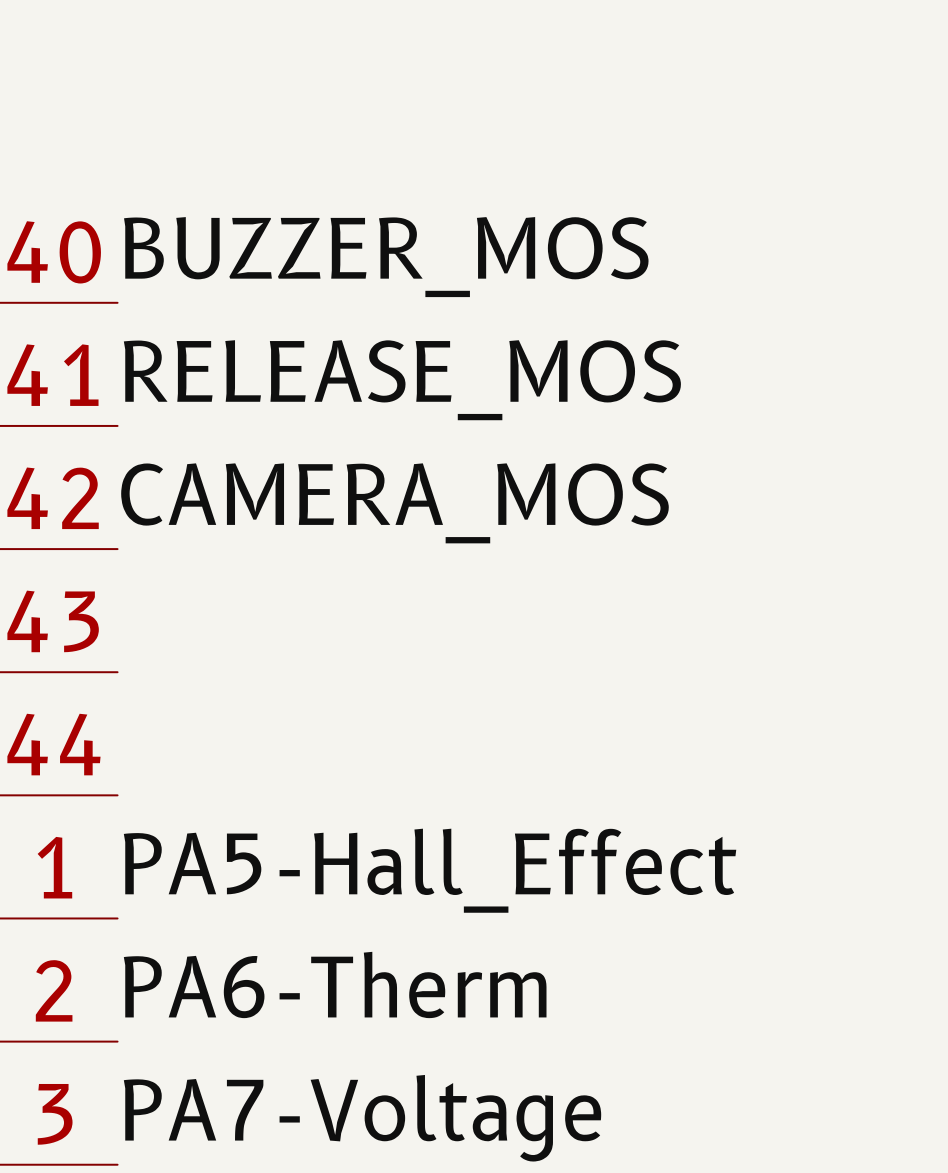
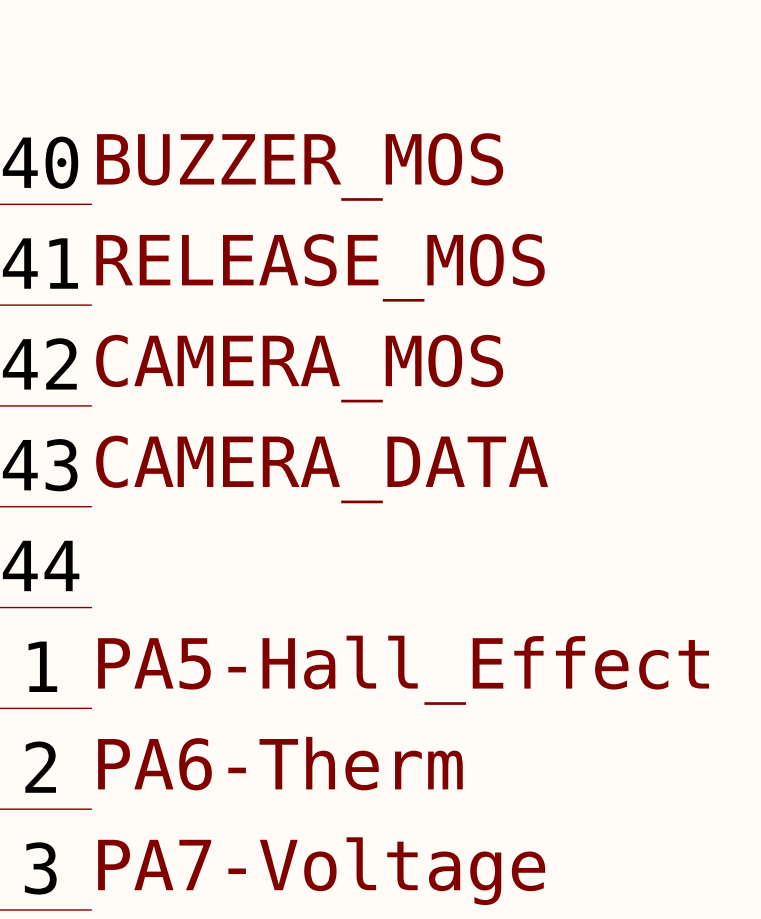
label: none -> CAMERA_DATA (322, 469)

